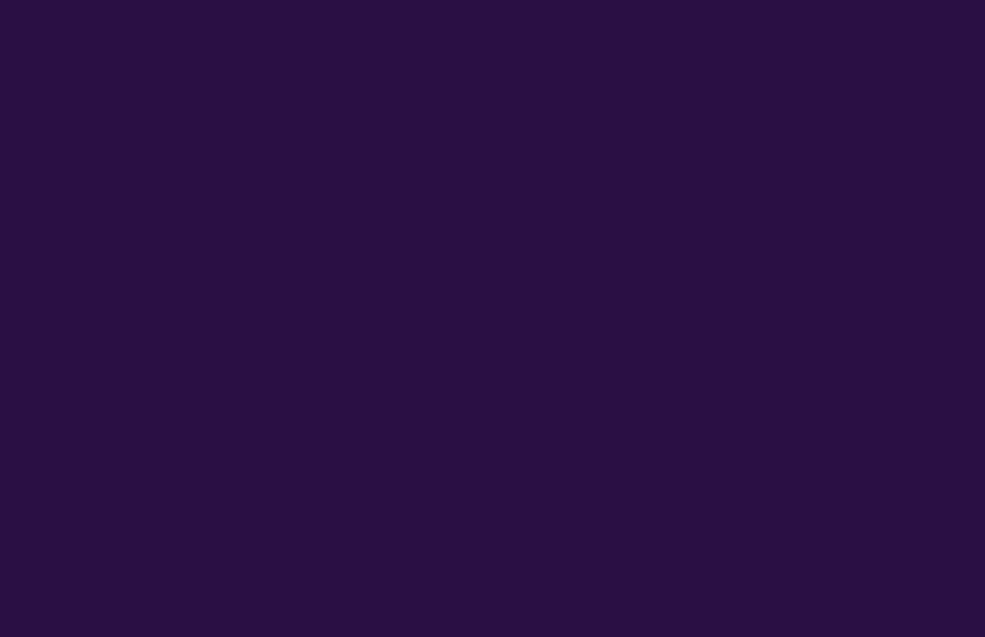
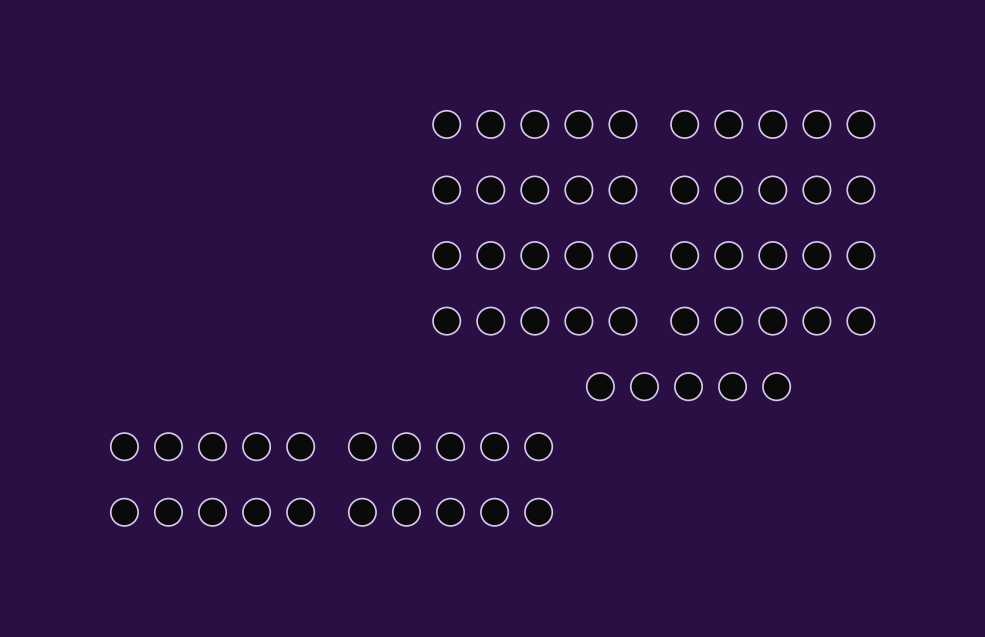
part: none -> (534, 124)
part: none -> (772, 124)
part: none -> (534, 189)
part: none -> (772, 189)
part: none -> (534, 255)
part: none -> (772, 255)
part: none -> (534, 321)
part: none -> (772, 321)
part: none -> (688, 386)
part: none -> (212, 446)
part: none -> (450, 446)
part: none -> (212, 512)
part: none -> (450, 512)

